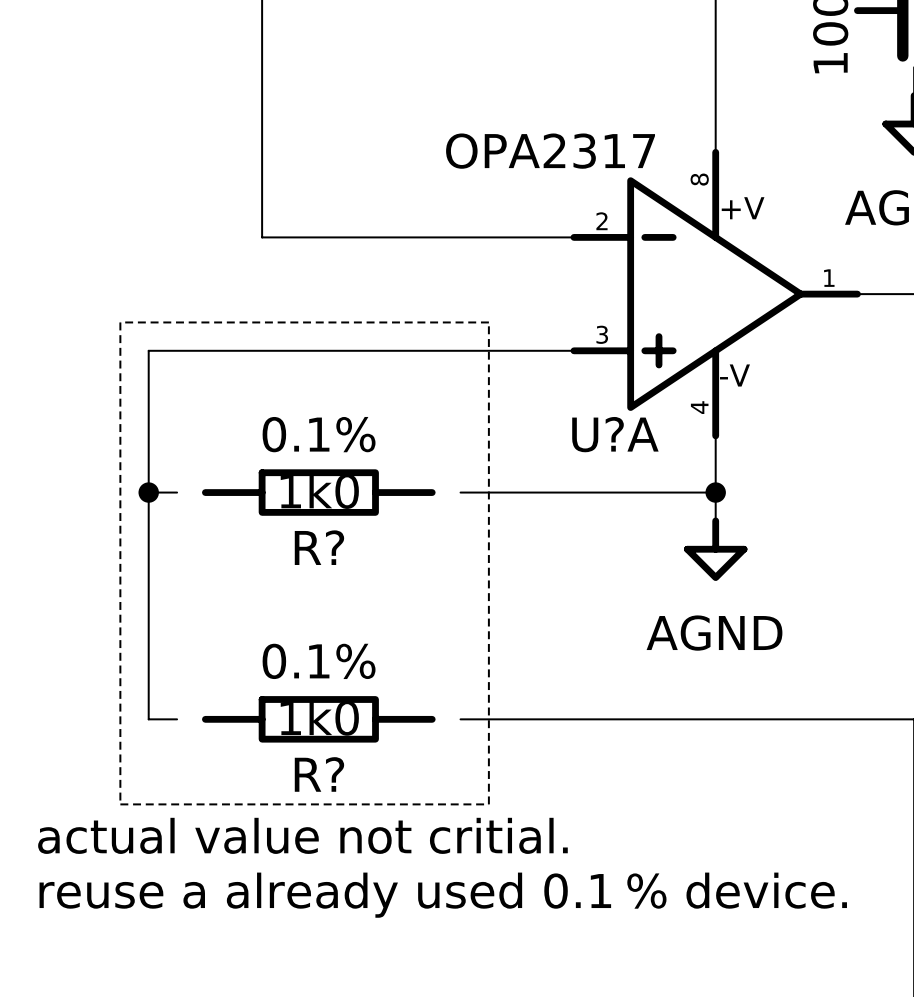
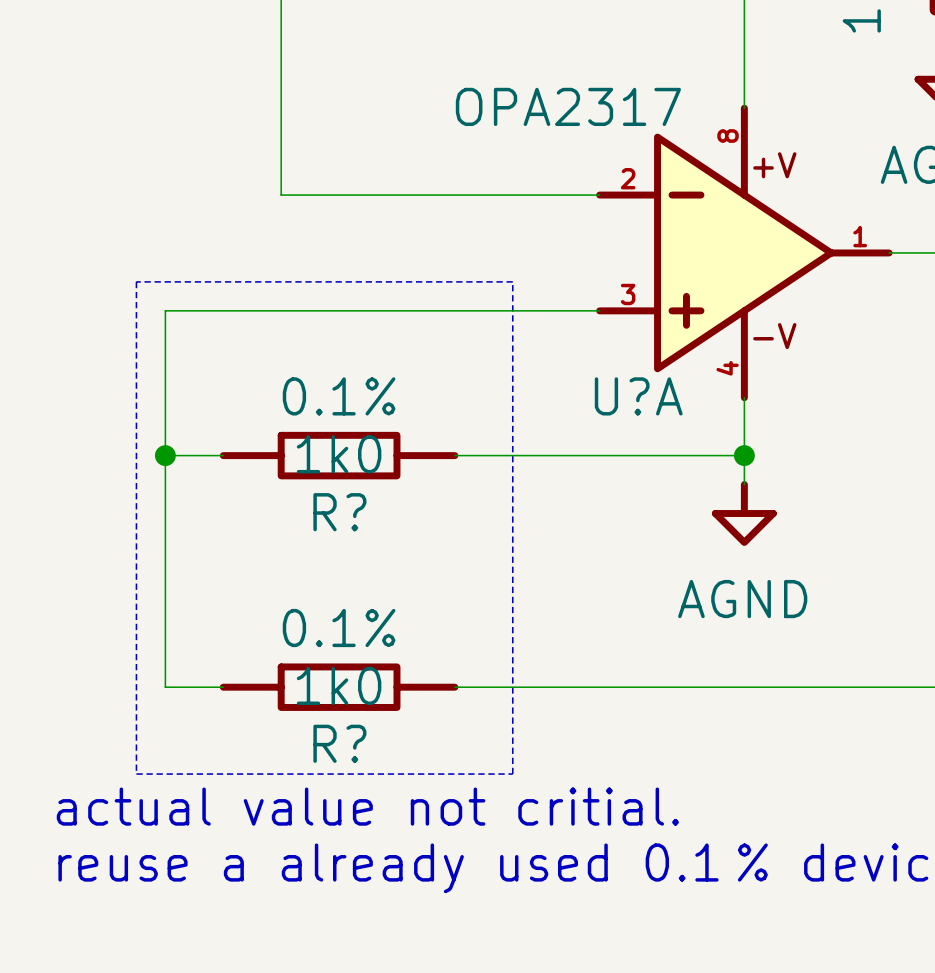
wire: none -> (194, 455) (223, 455)
wire: none -> (454, 455) (483, 455)
wire: none -> (194, 687) (223, 687)
wire: none -> (454, 687) (483, 687)

